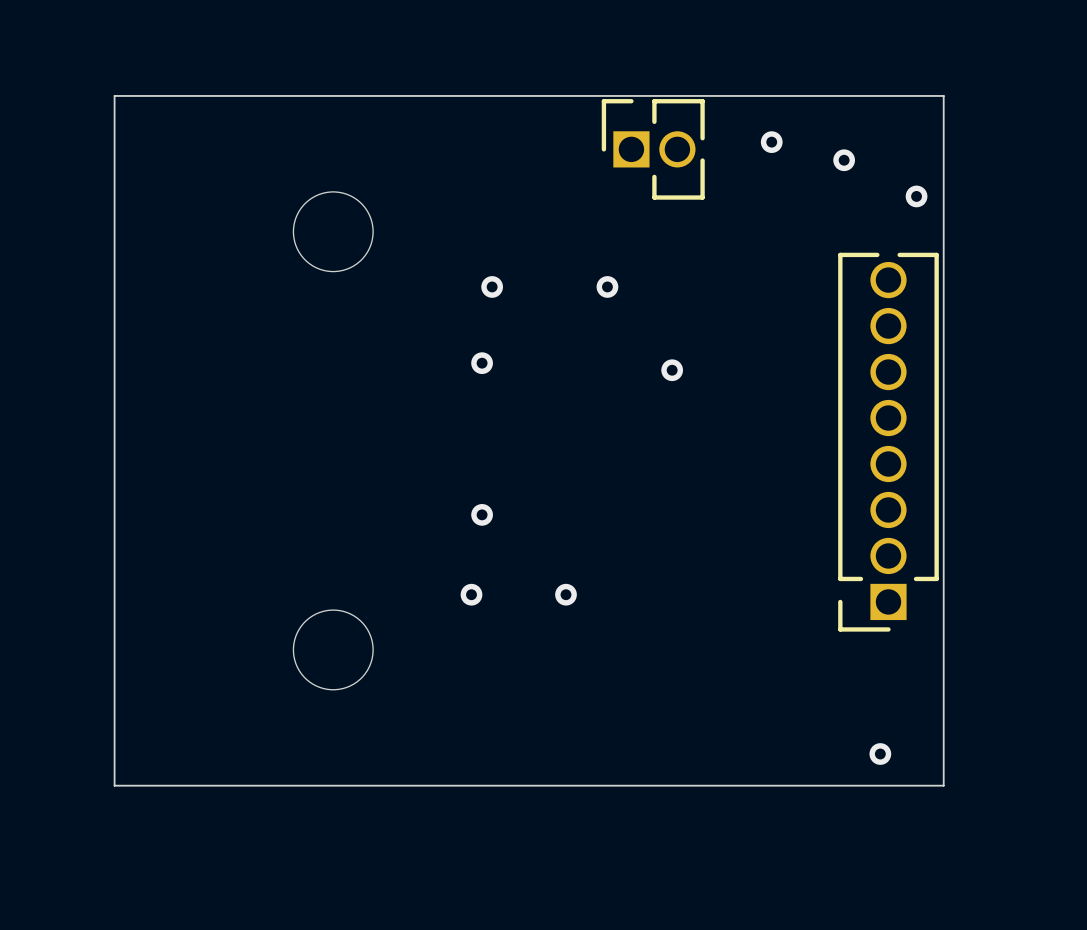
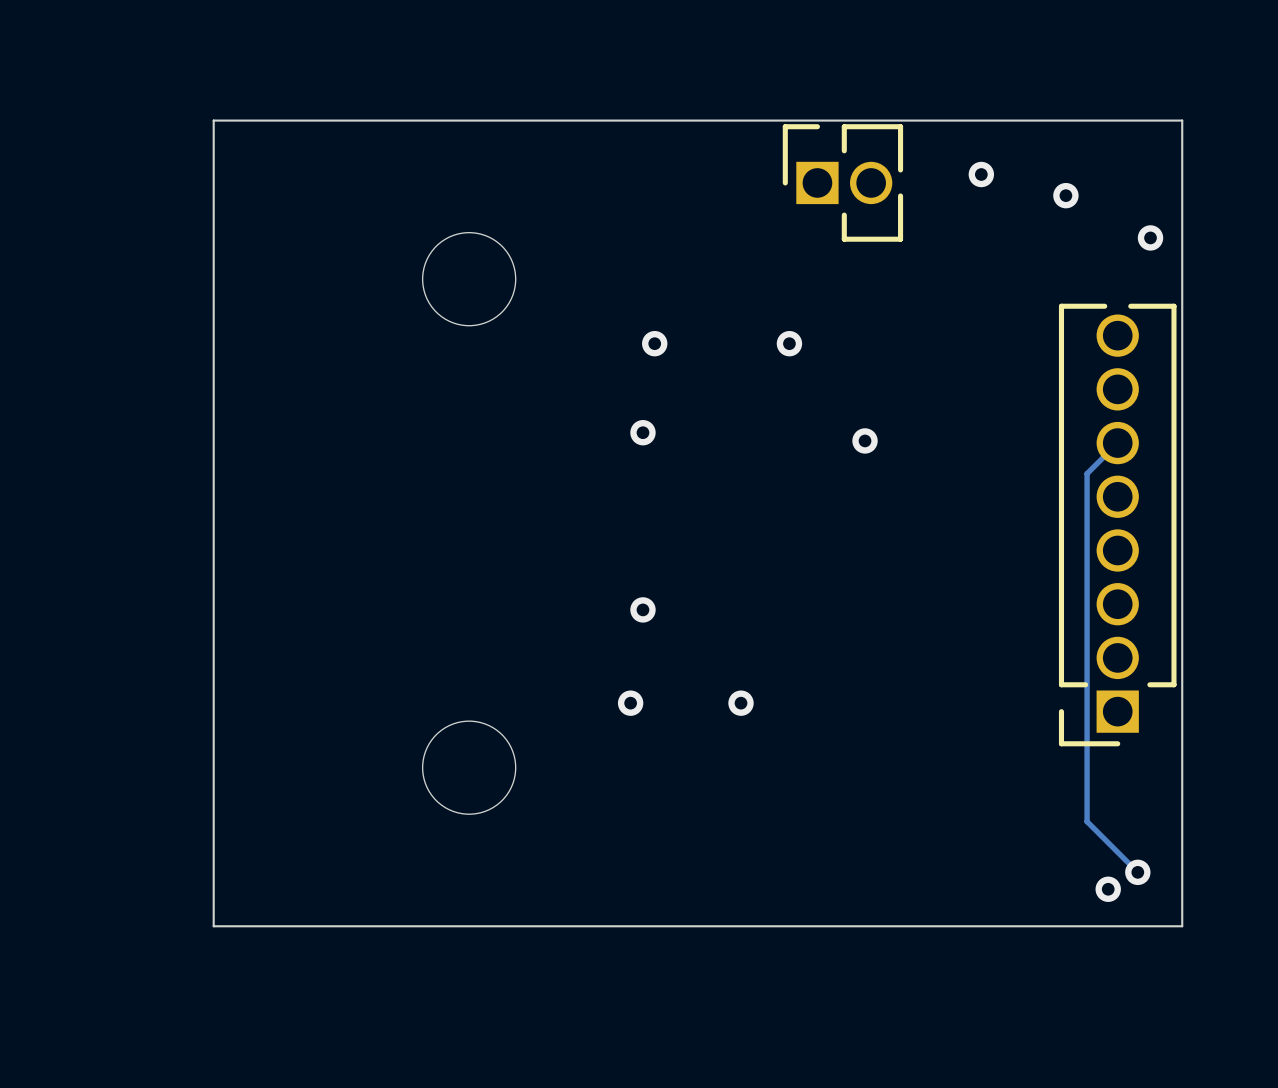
track: none -> (1117, 443) (1087, 473) (1087, 821) (1137, 872)
via: none -> (1137, 872)

